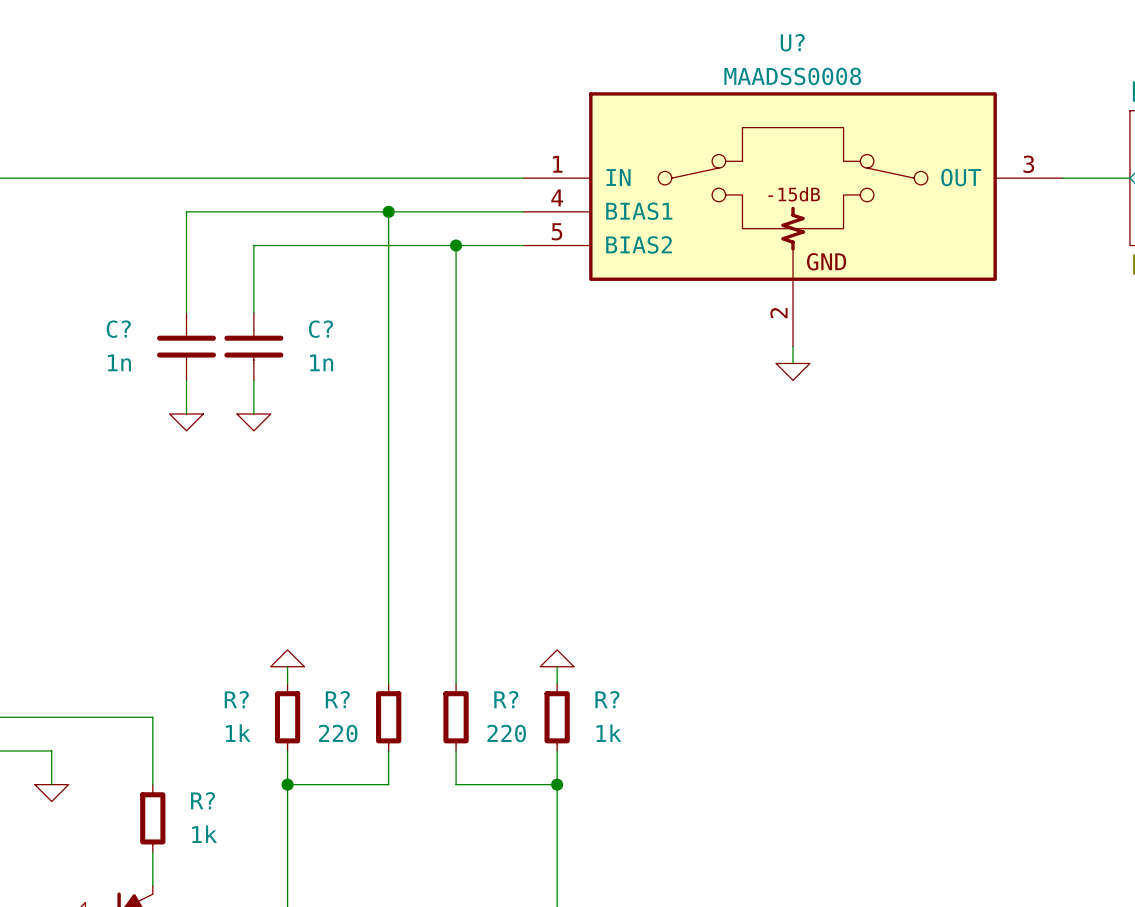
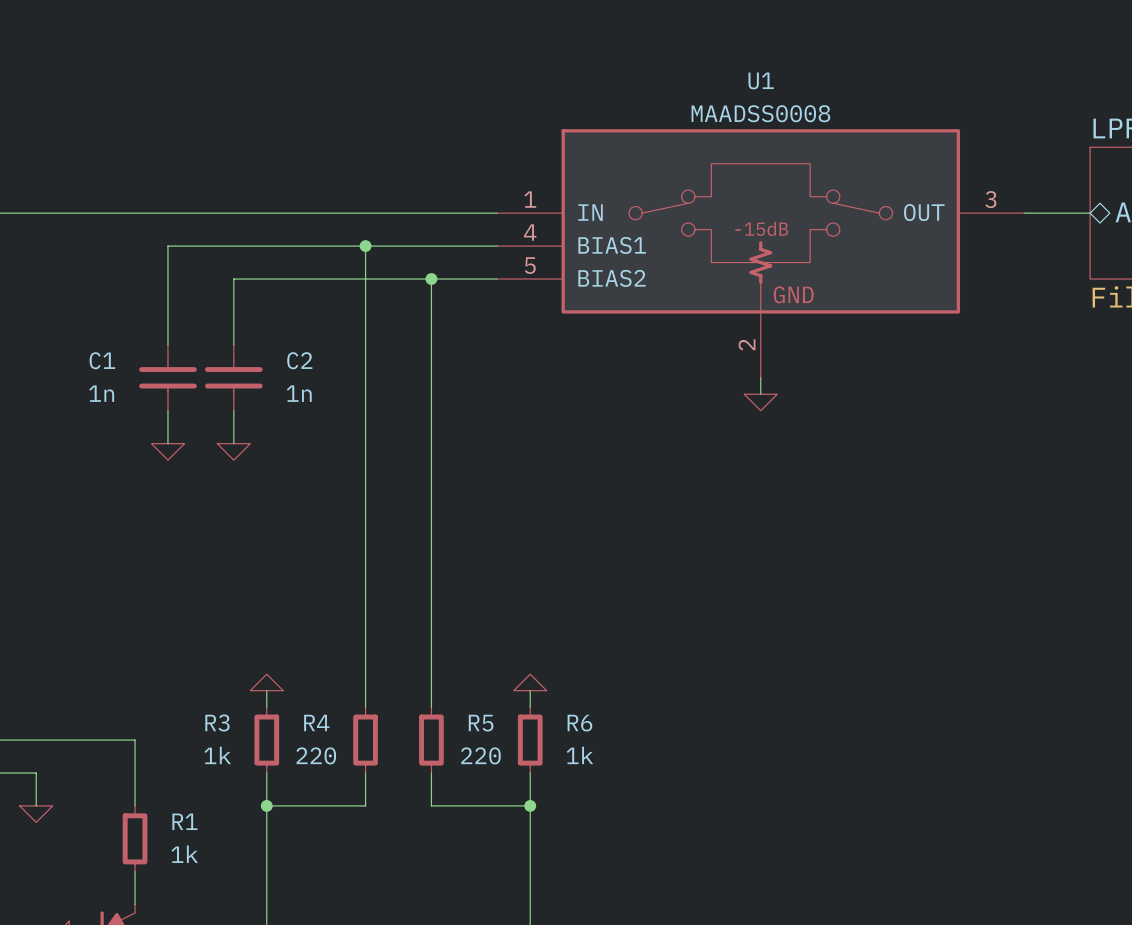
U? name: U? (792, 42) -> U1 (761, 80)
C? name: C? (118, 329) -> C1 (102, 360)
C? name: C? (320, 329) -> C2 (299, 360)
R? name: R? (236, 699) -> R3 (217, 722)
R? name: R? (337, 699) -> R4 (316, 722)
R? name: R? (506, 699) -> R5 (481, 723)
R? name: R? (607, 699) -> R6 (579, 723)
R? name: R? (203, 800) -> R1 (184, 821)

